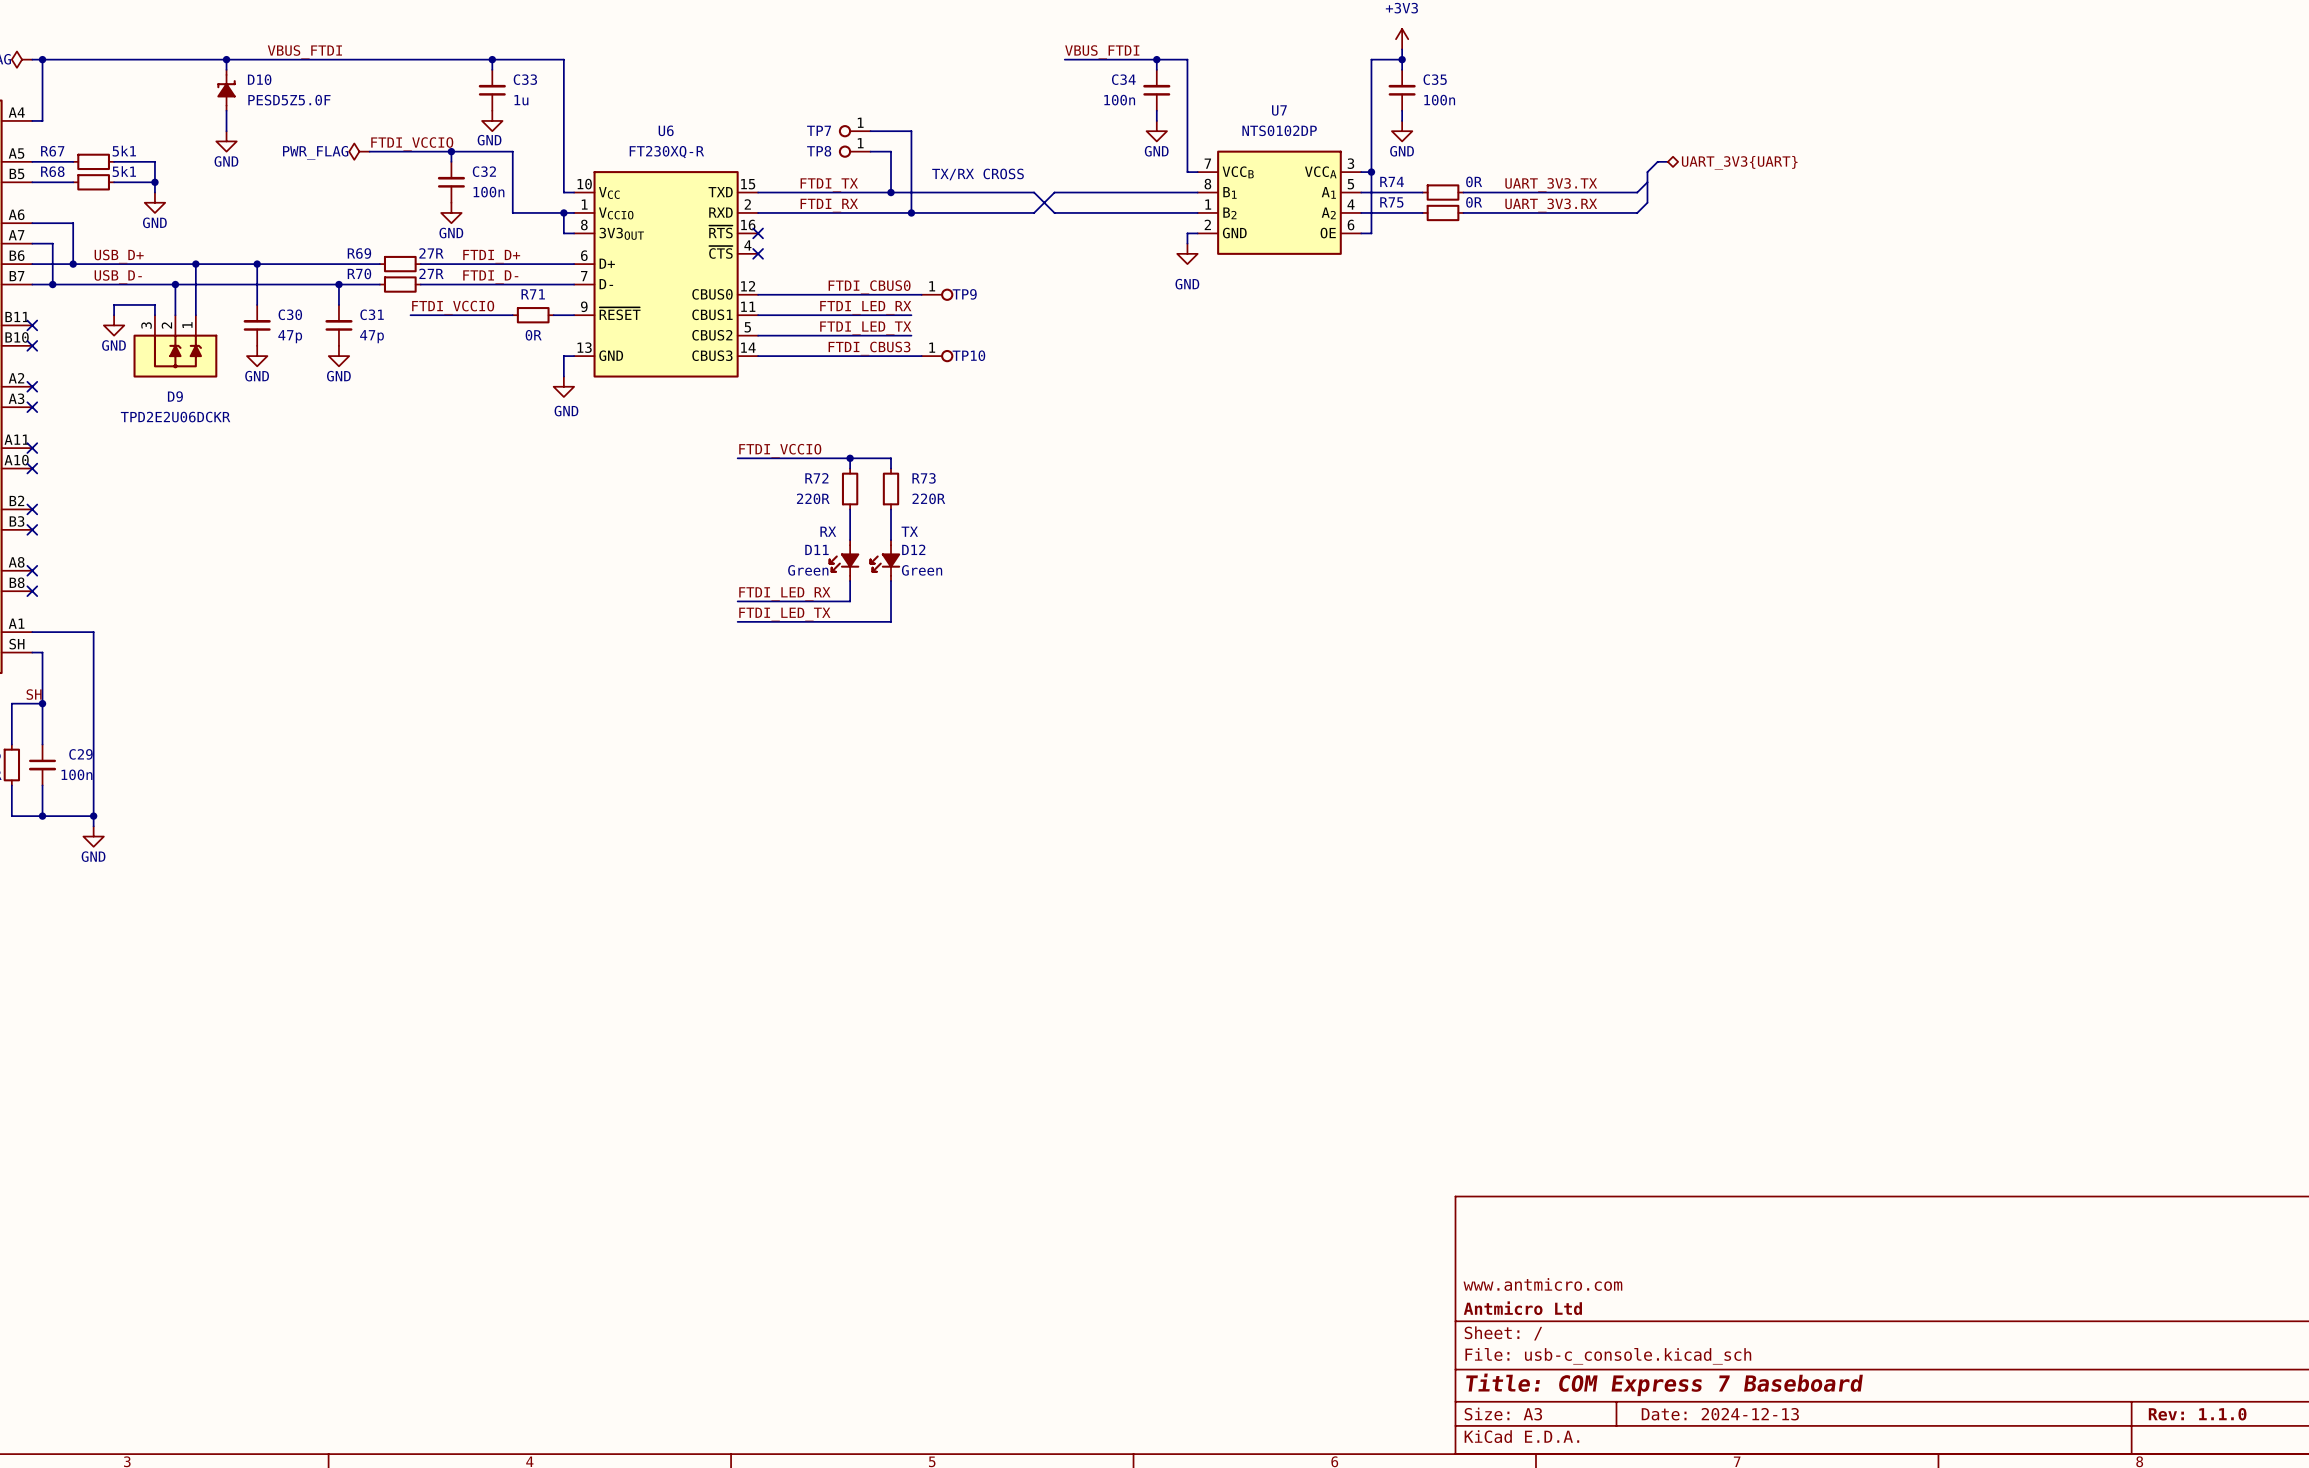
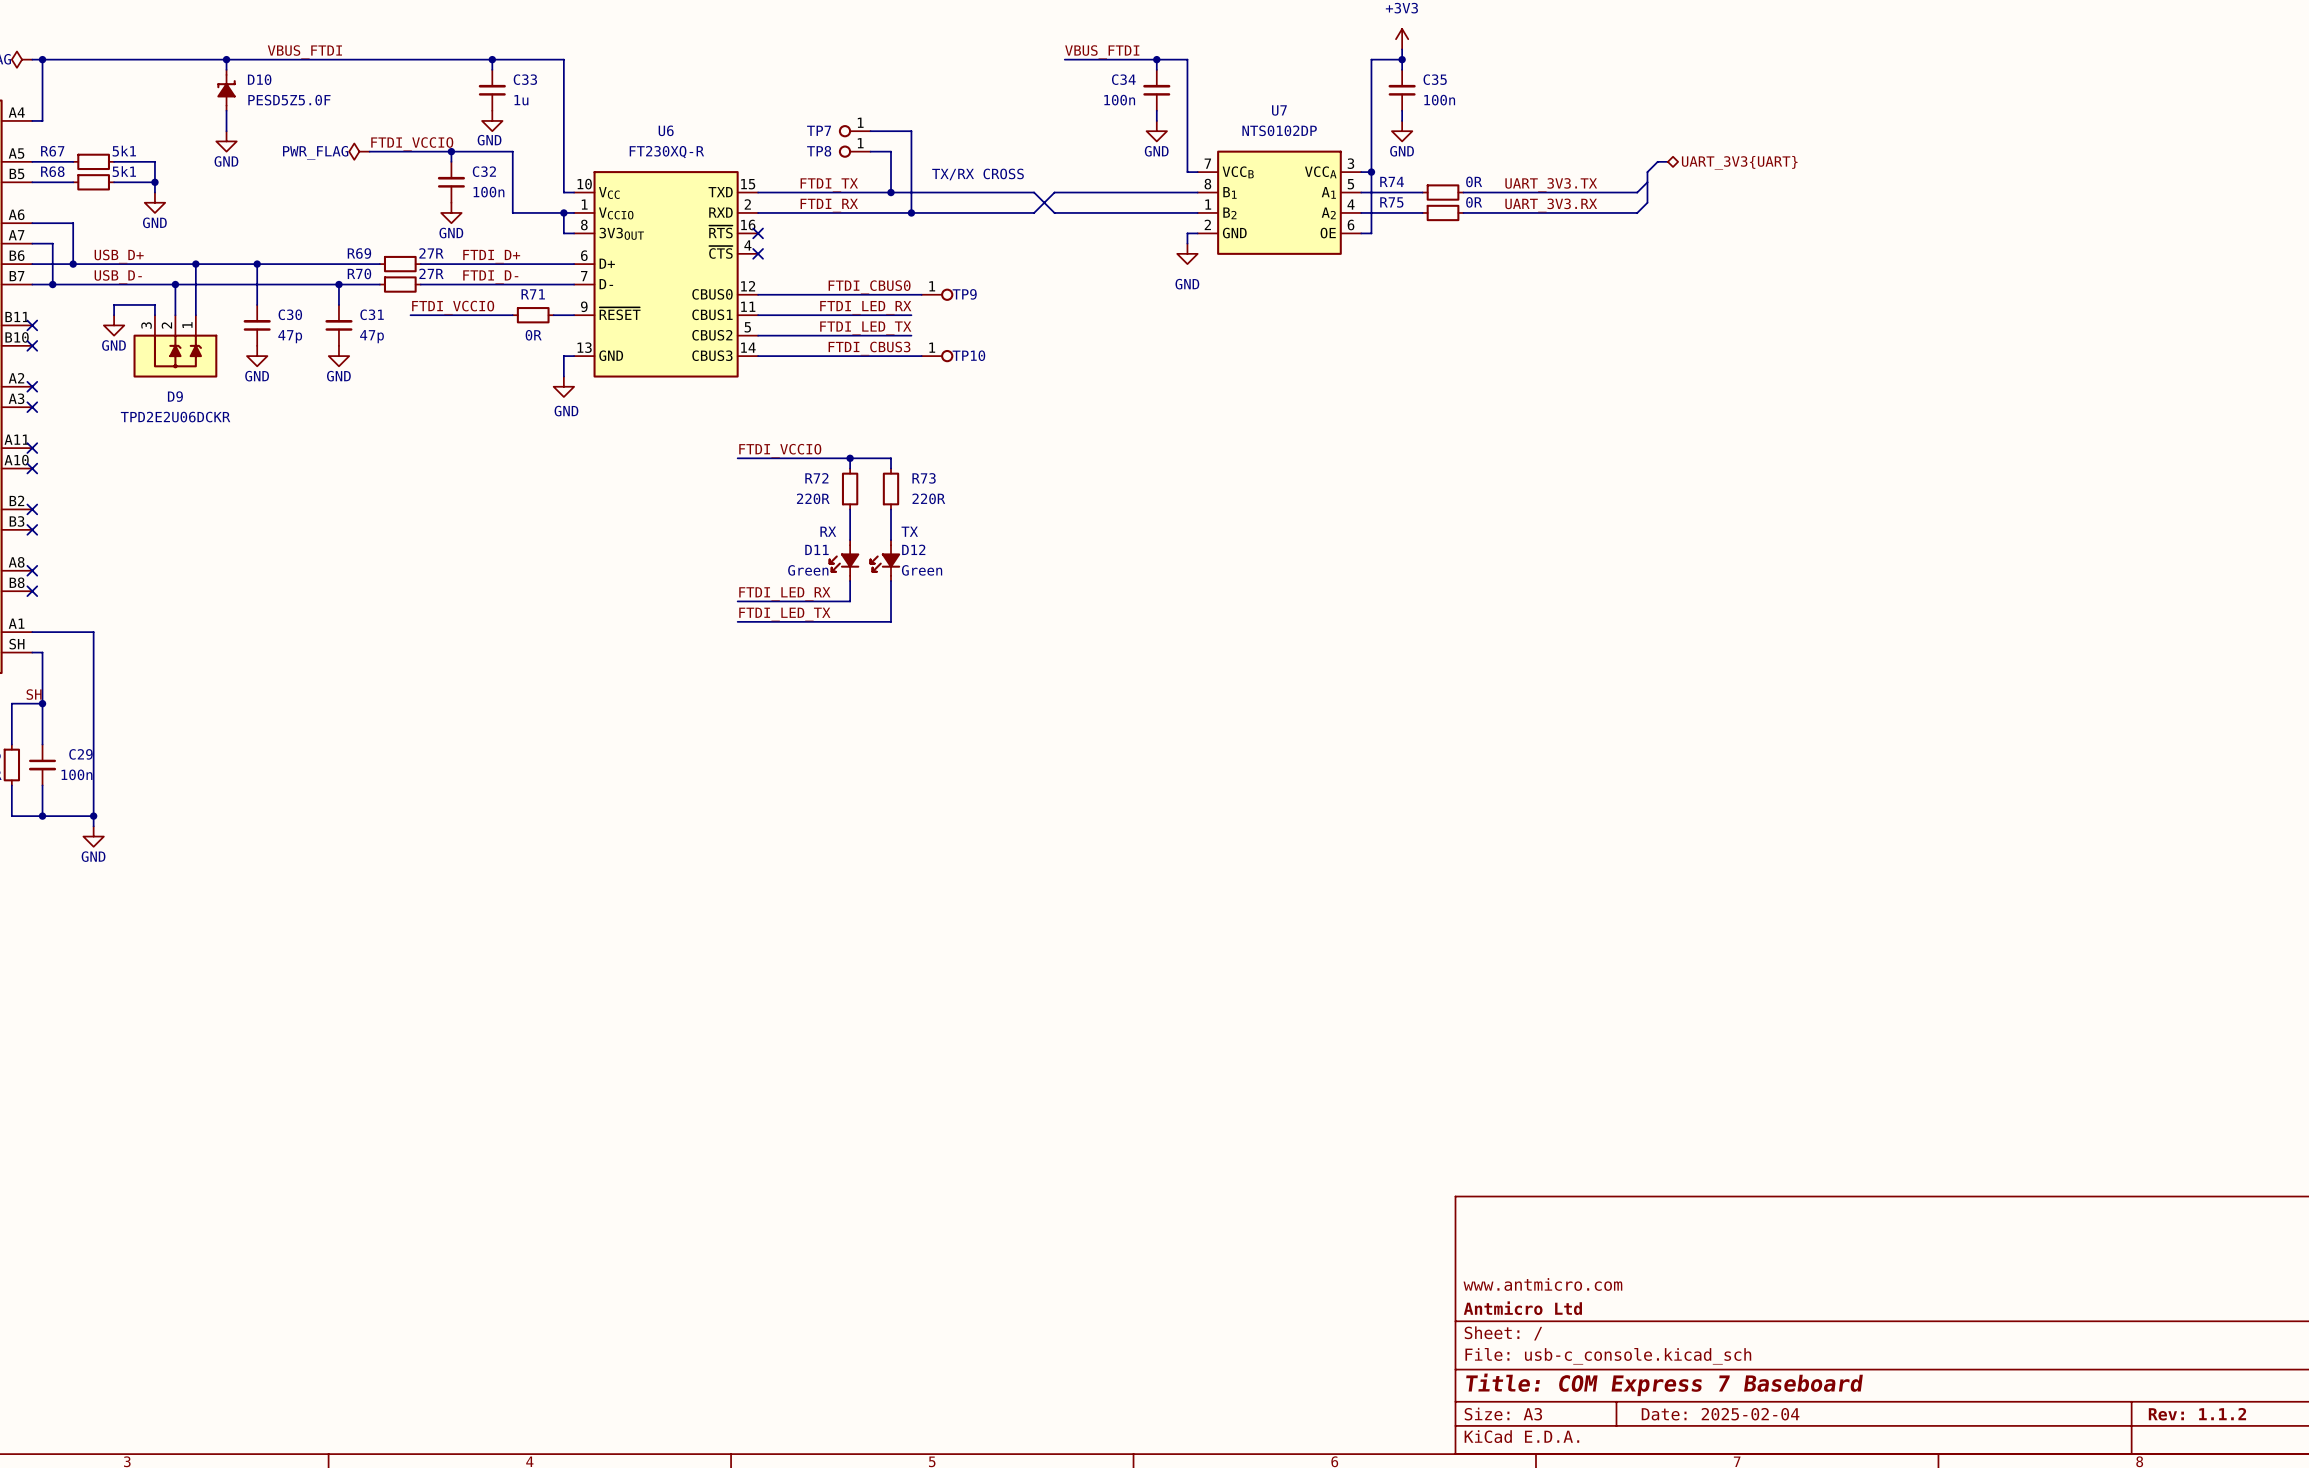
title block: Date: 2024-12-13 (1720, 1414) -> Date: 2025-02-04 (1720, 1414)
title block: Rev: 1.1.0 (2197, 1414) -> Rev: 1.1.2 (2197, 1414)

